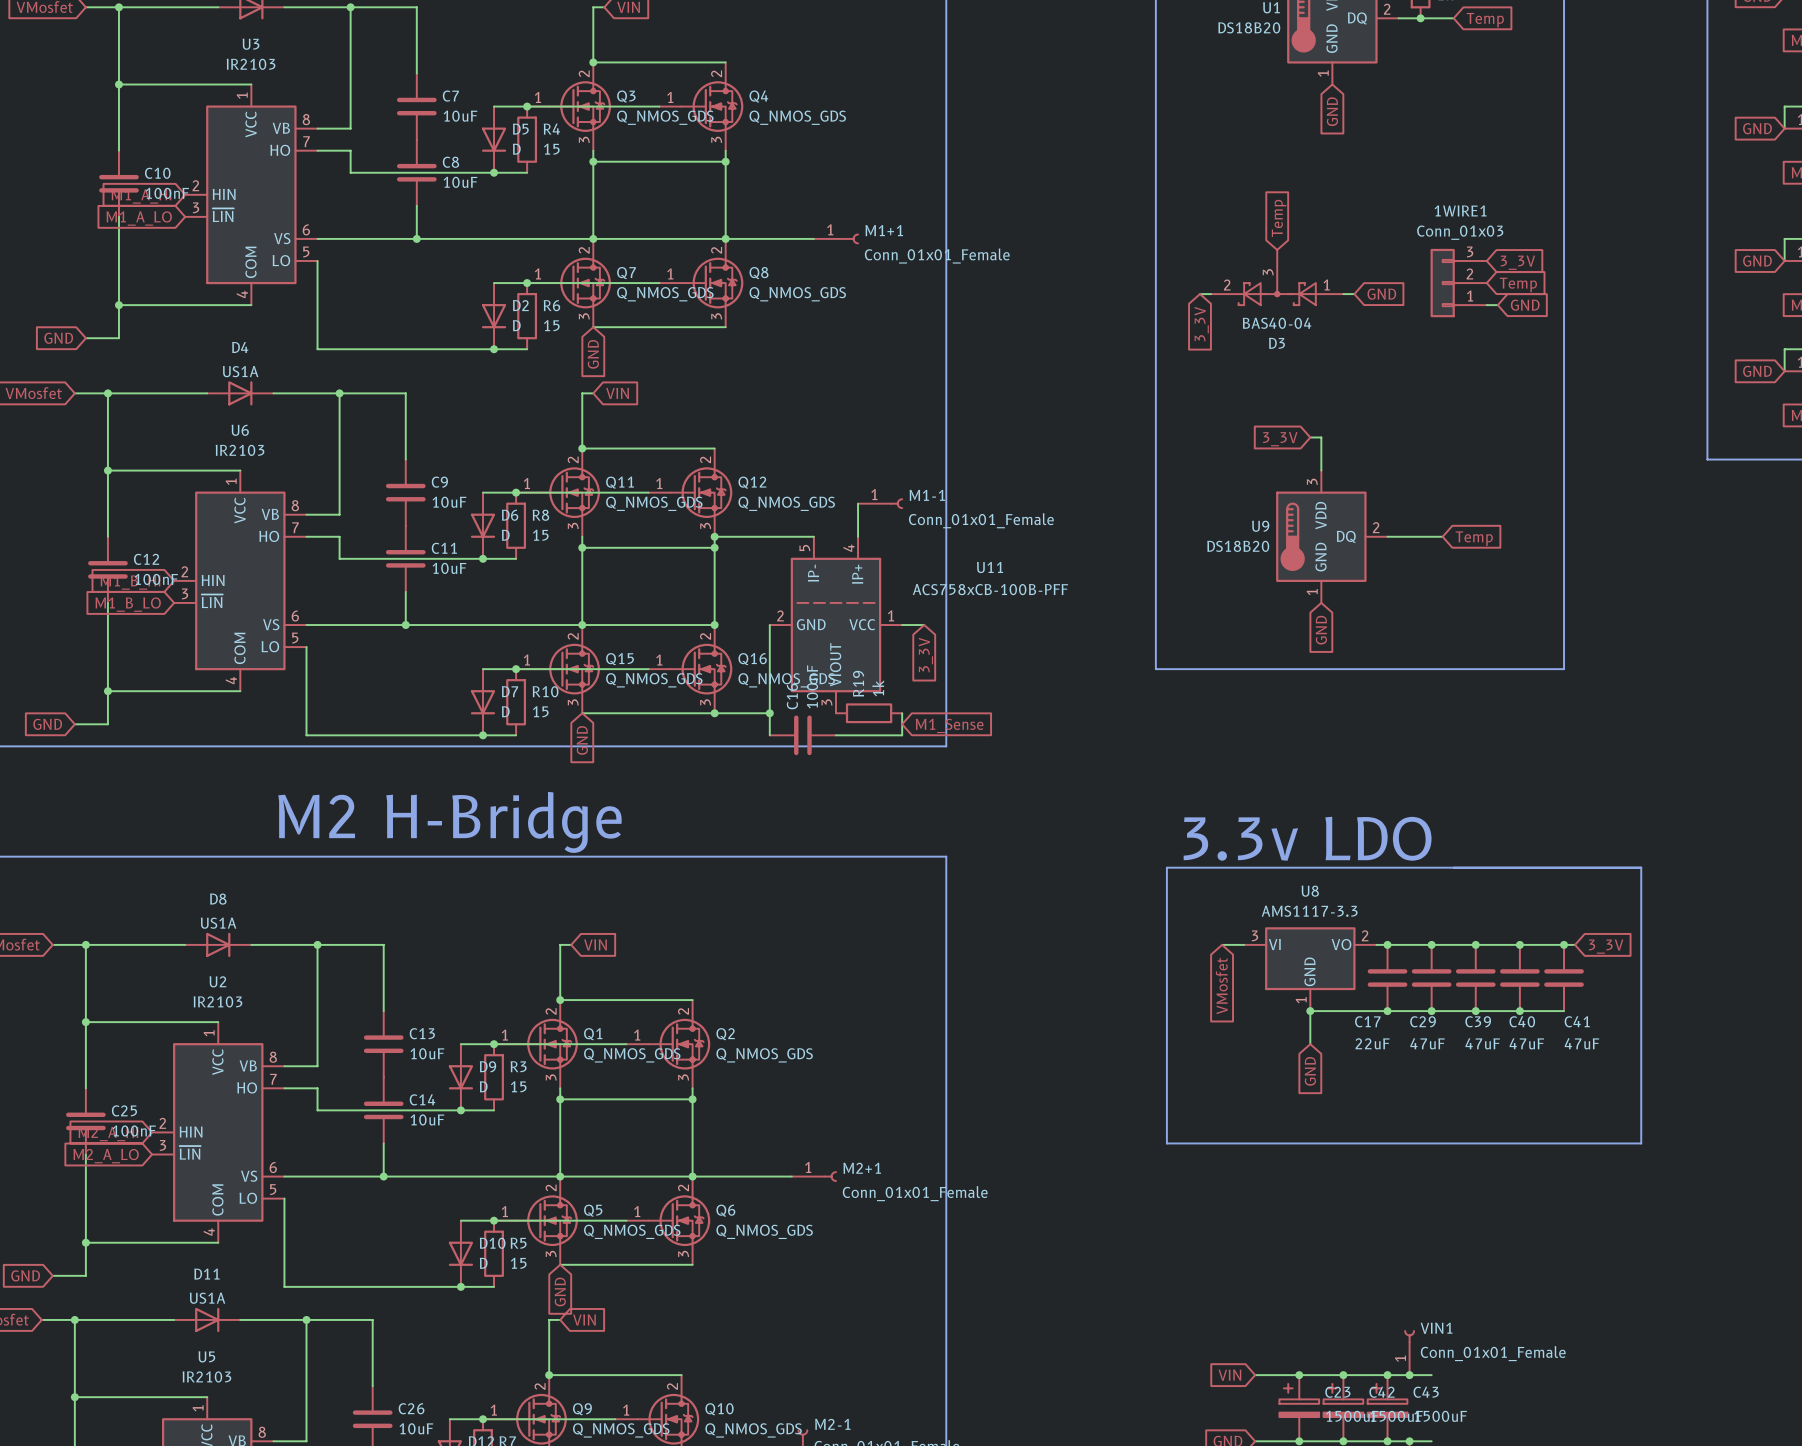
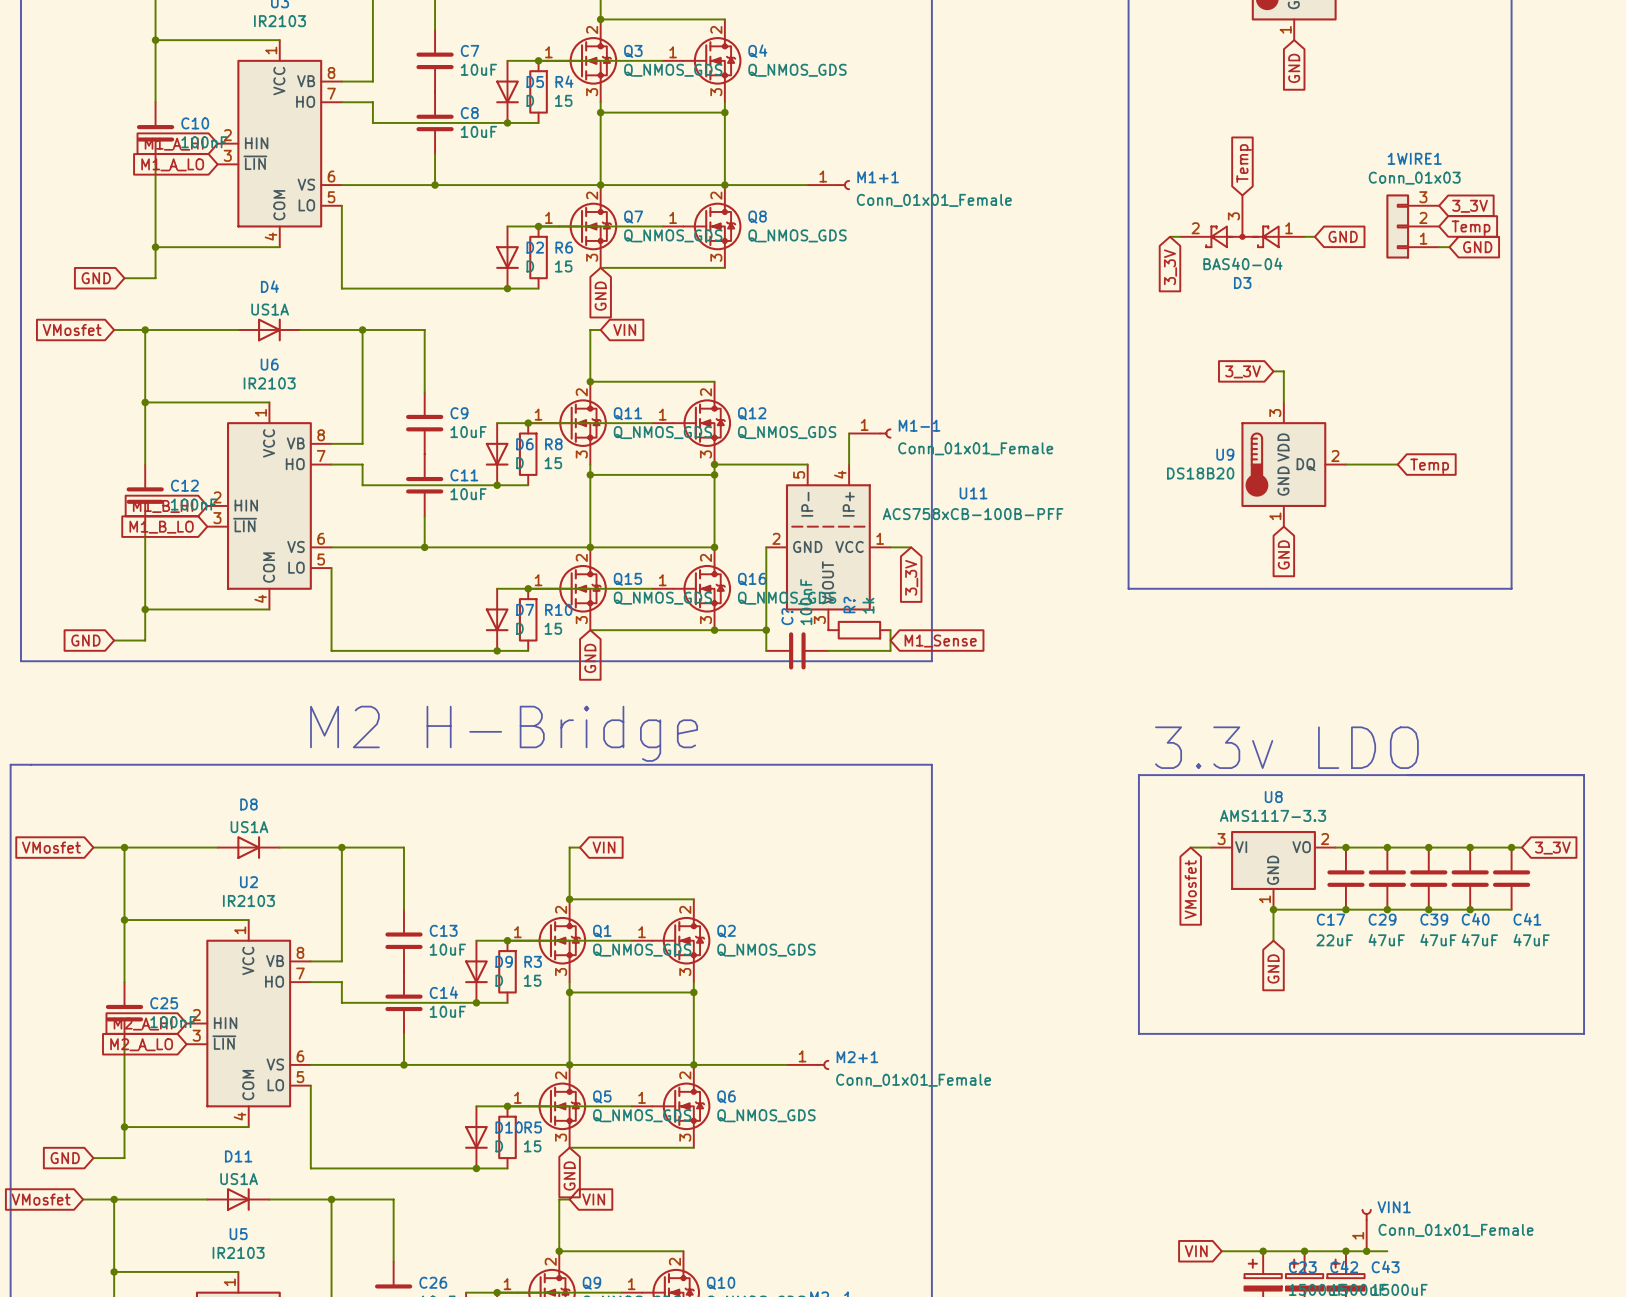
R19 name: R19 (858, 683) -> R? (849, 605)
C16 name: C16 (792, 696) -> C? (787, 616)

